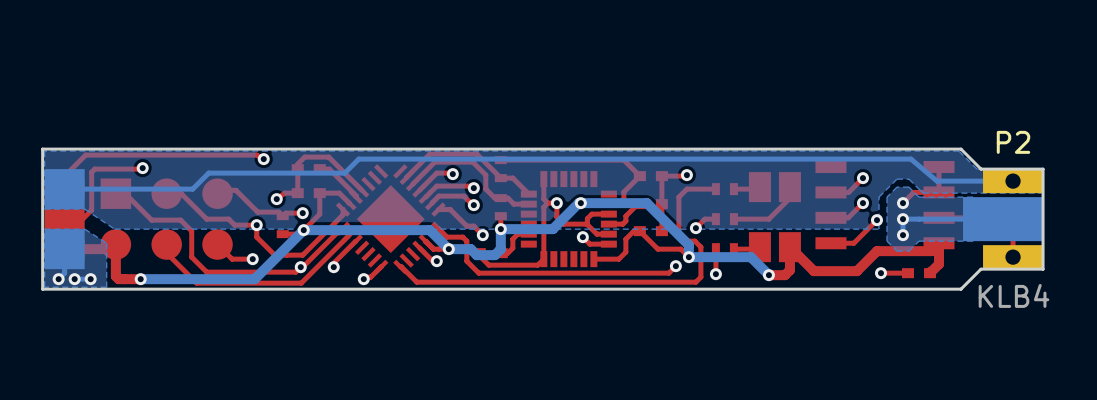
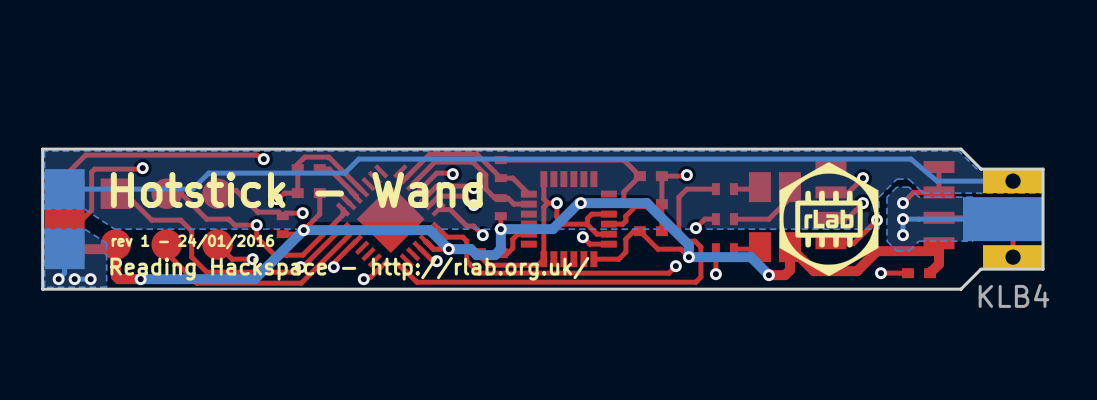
P2 name: P2 (1013, 142) -> none
drawing: none -> [779, 162, 879, 277]
text: none -> Hotstick - Wand (296, 190)
text: none -> rev 1 - 24/01/2016 (192, 241)
text: none -> Reading Hackspace - http://rlab.org.uk/ (349, 268)

